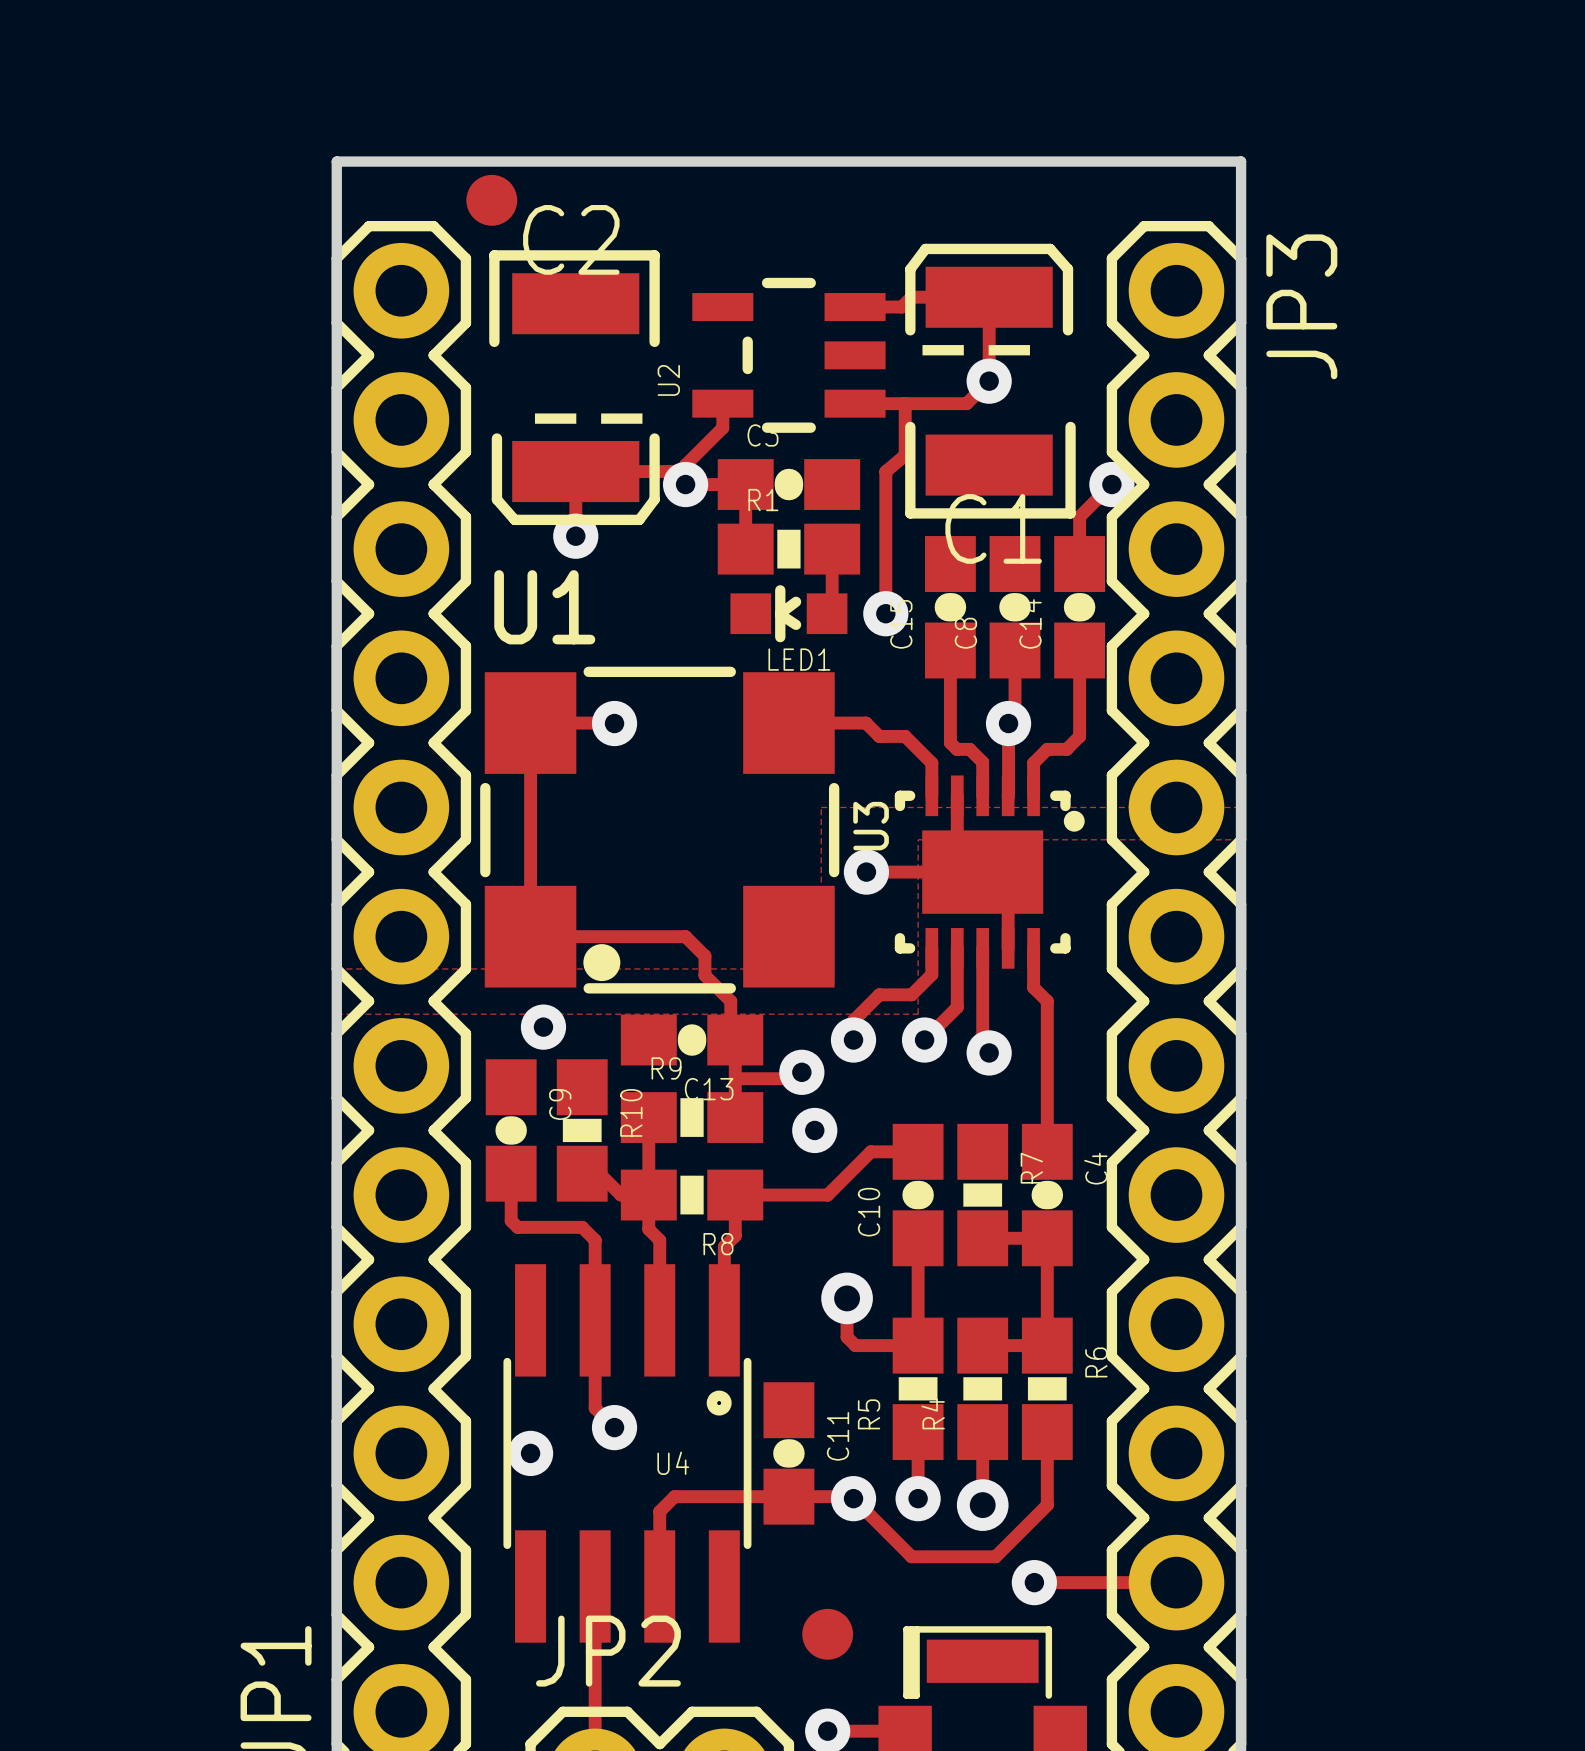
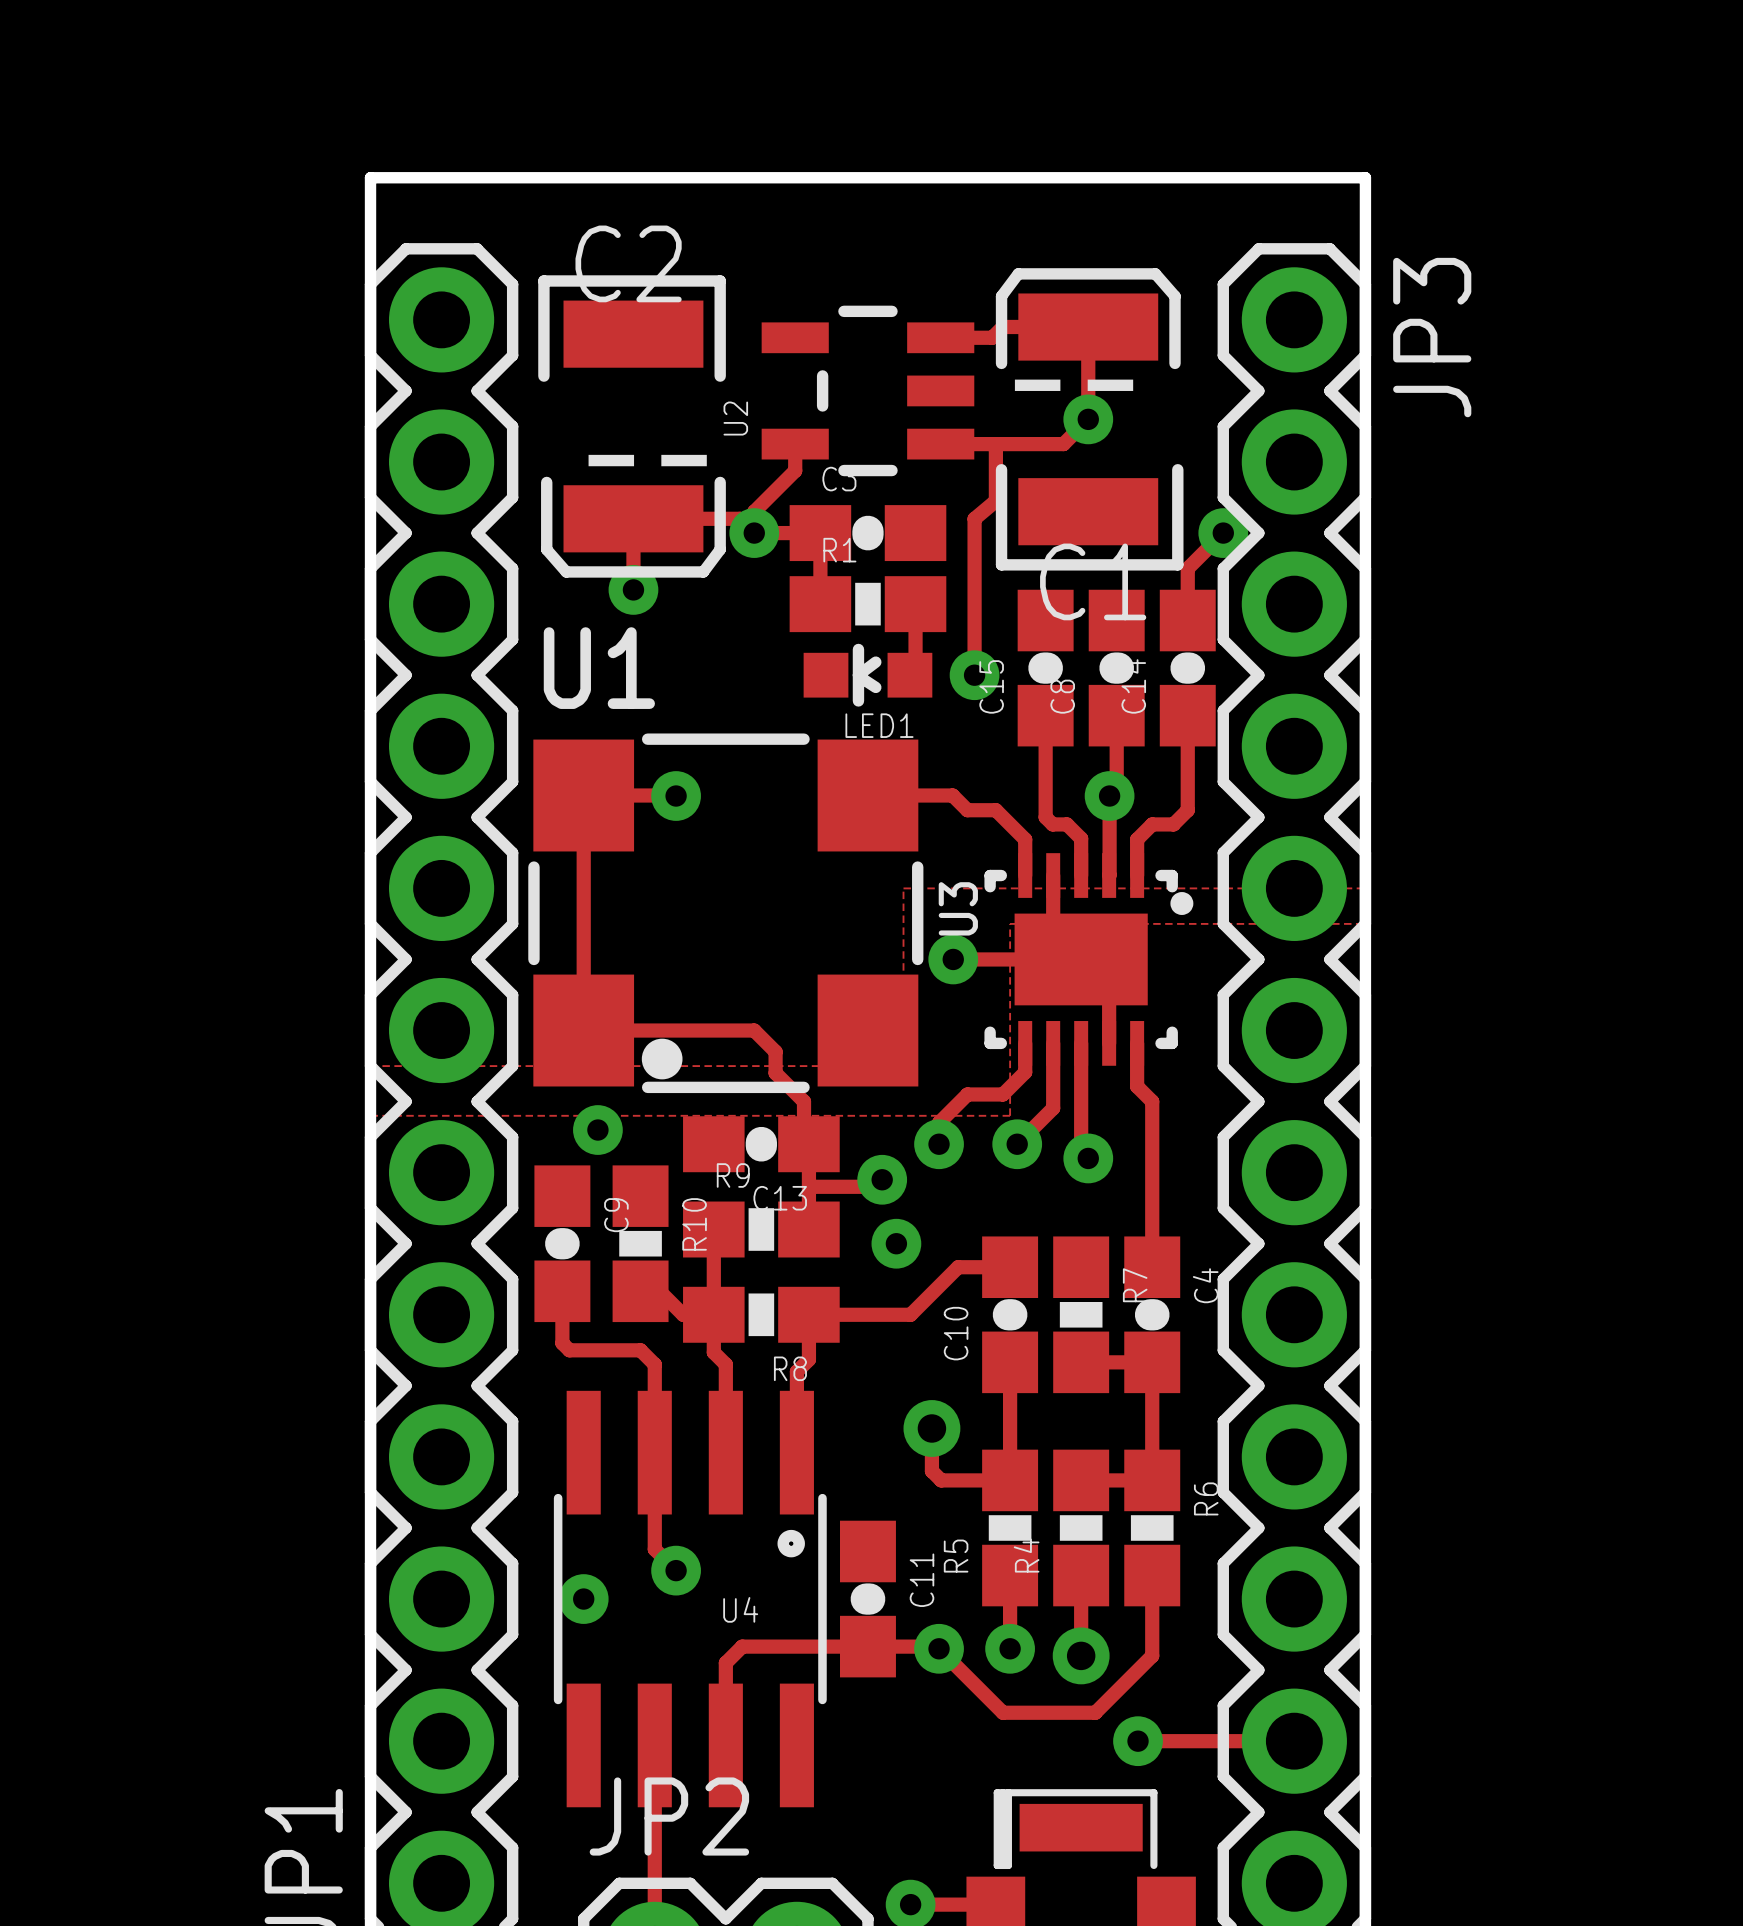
part: (491, 200) -> none
part: (827, 1634) -> none

